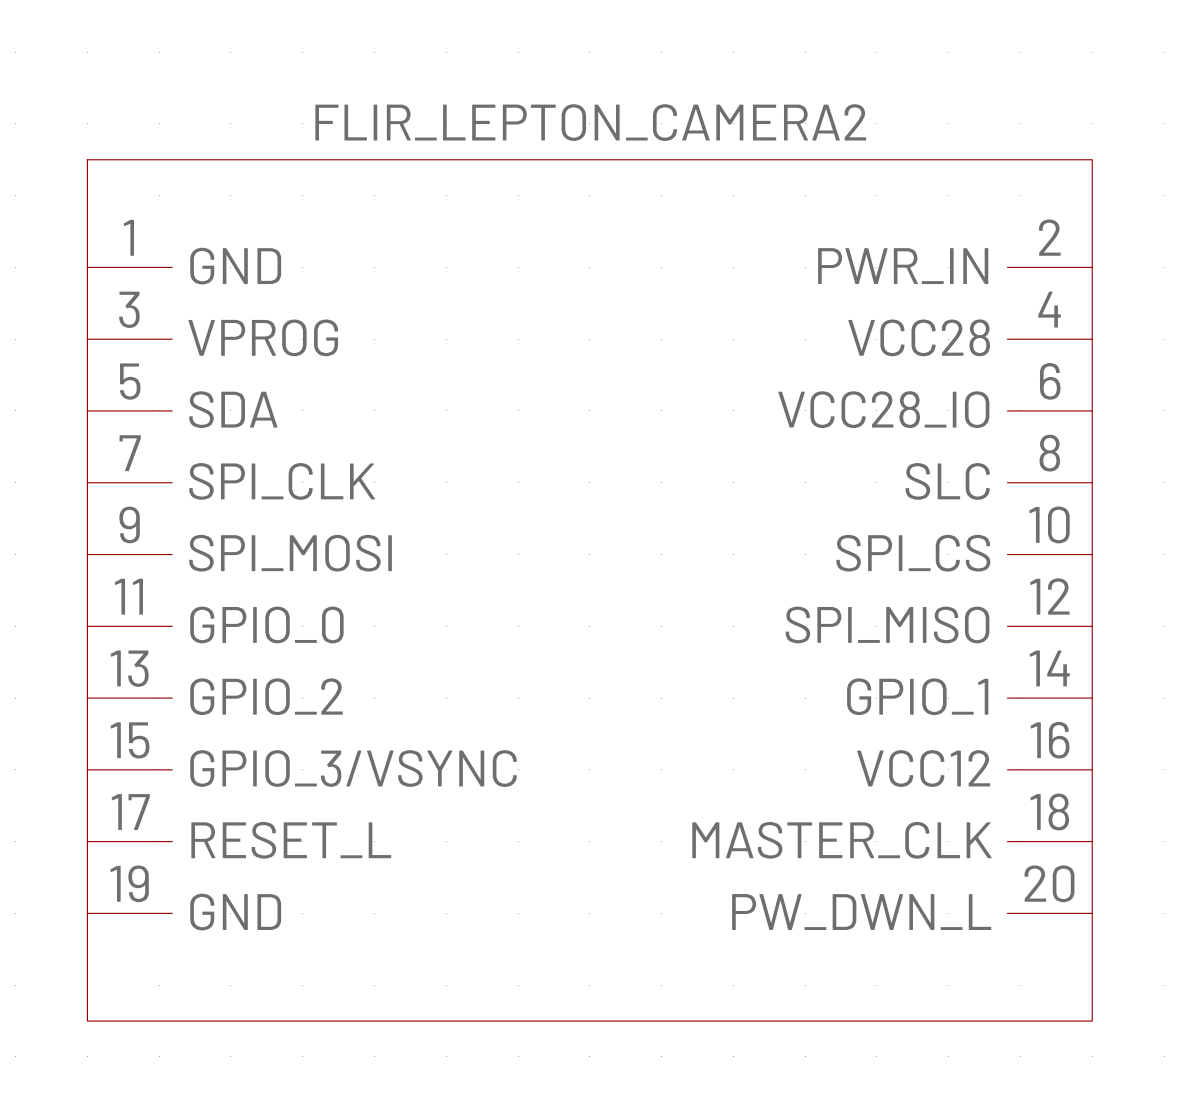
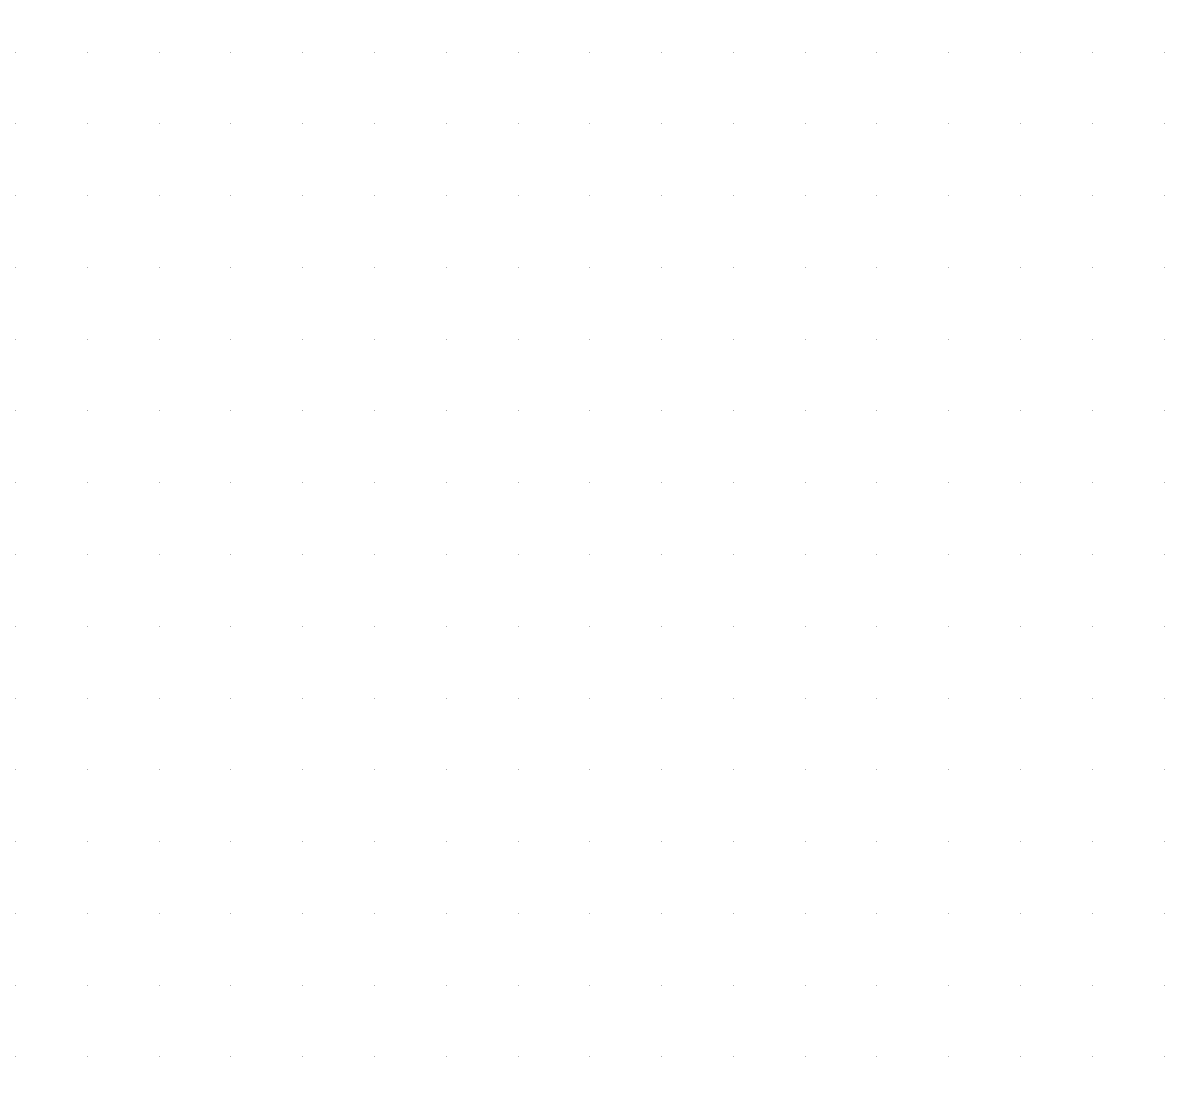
FLIR_LEPTON_CAMERA2: (589, 590) -> none

